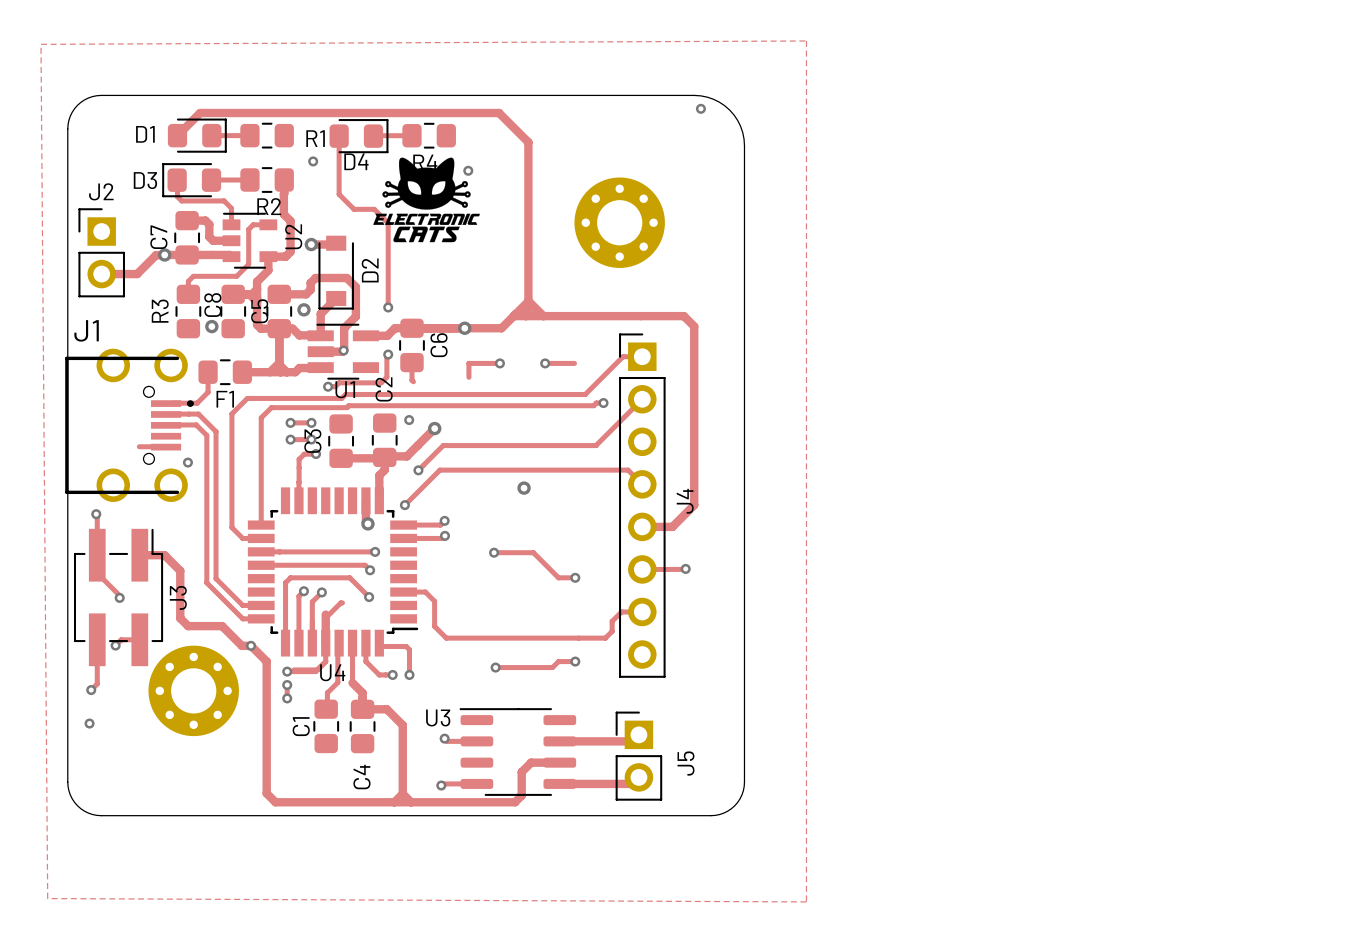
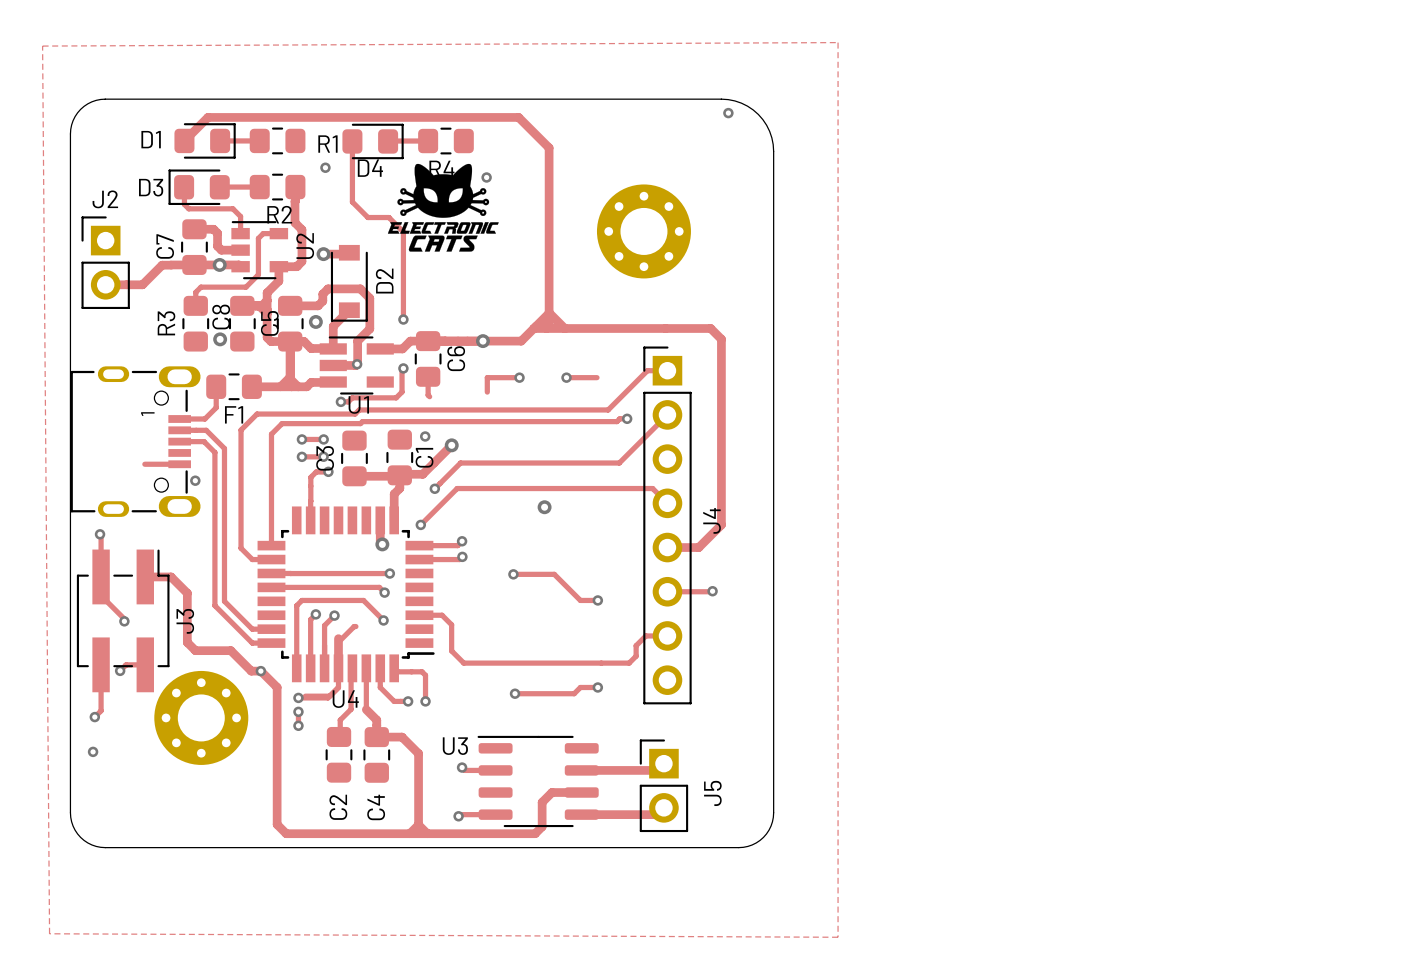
via position: (164, 254) -> (219, 264)
C2 name: C2 (384, 389) -> C1 (424, 457)
part: none -> (135, 441)
J1: (129, 425) -> none
C1 name: C1 (301, 726) -> C2 (338, 807)

